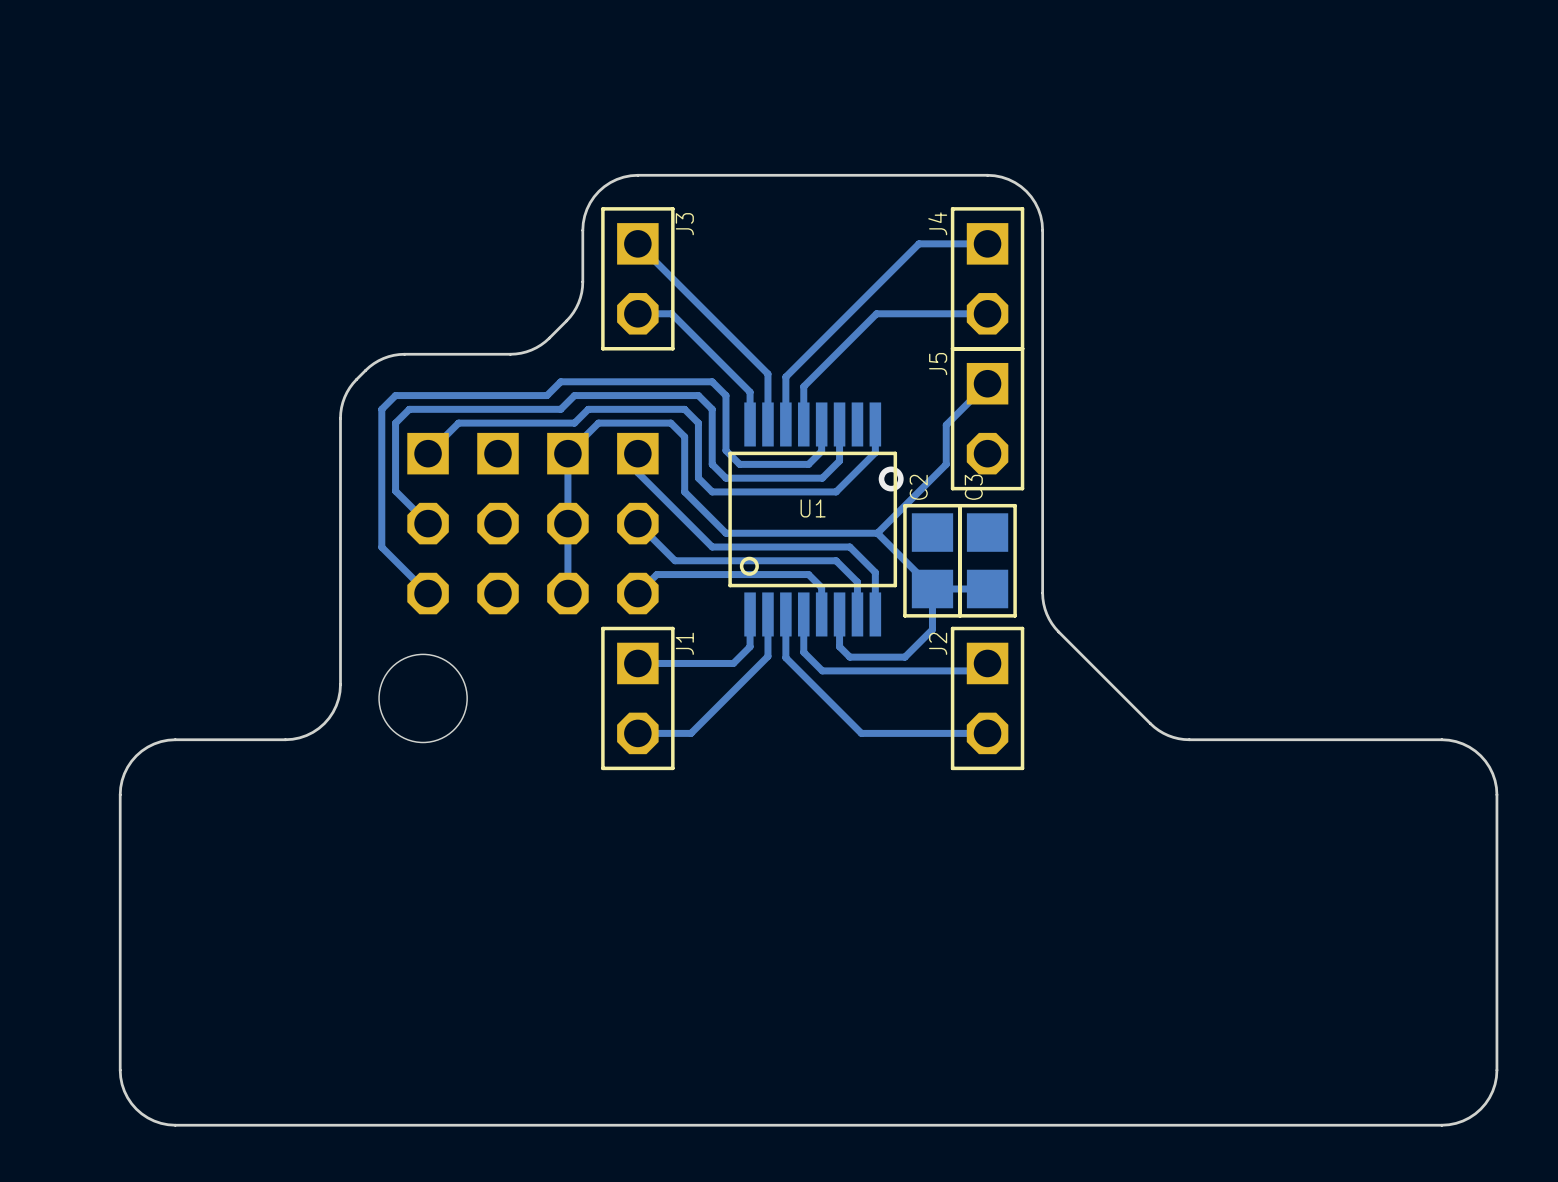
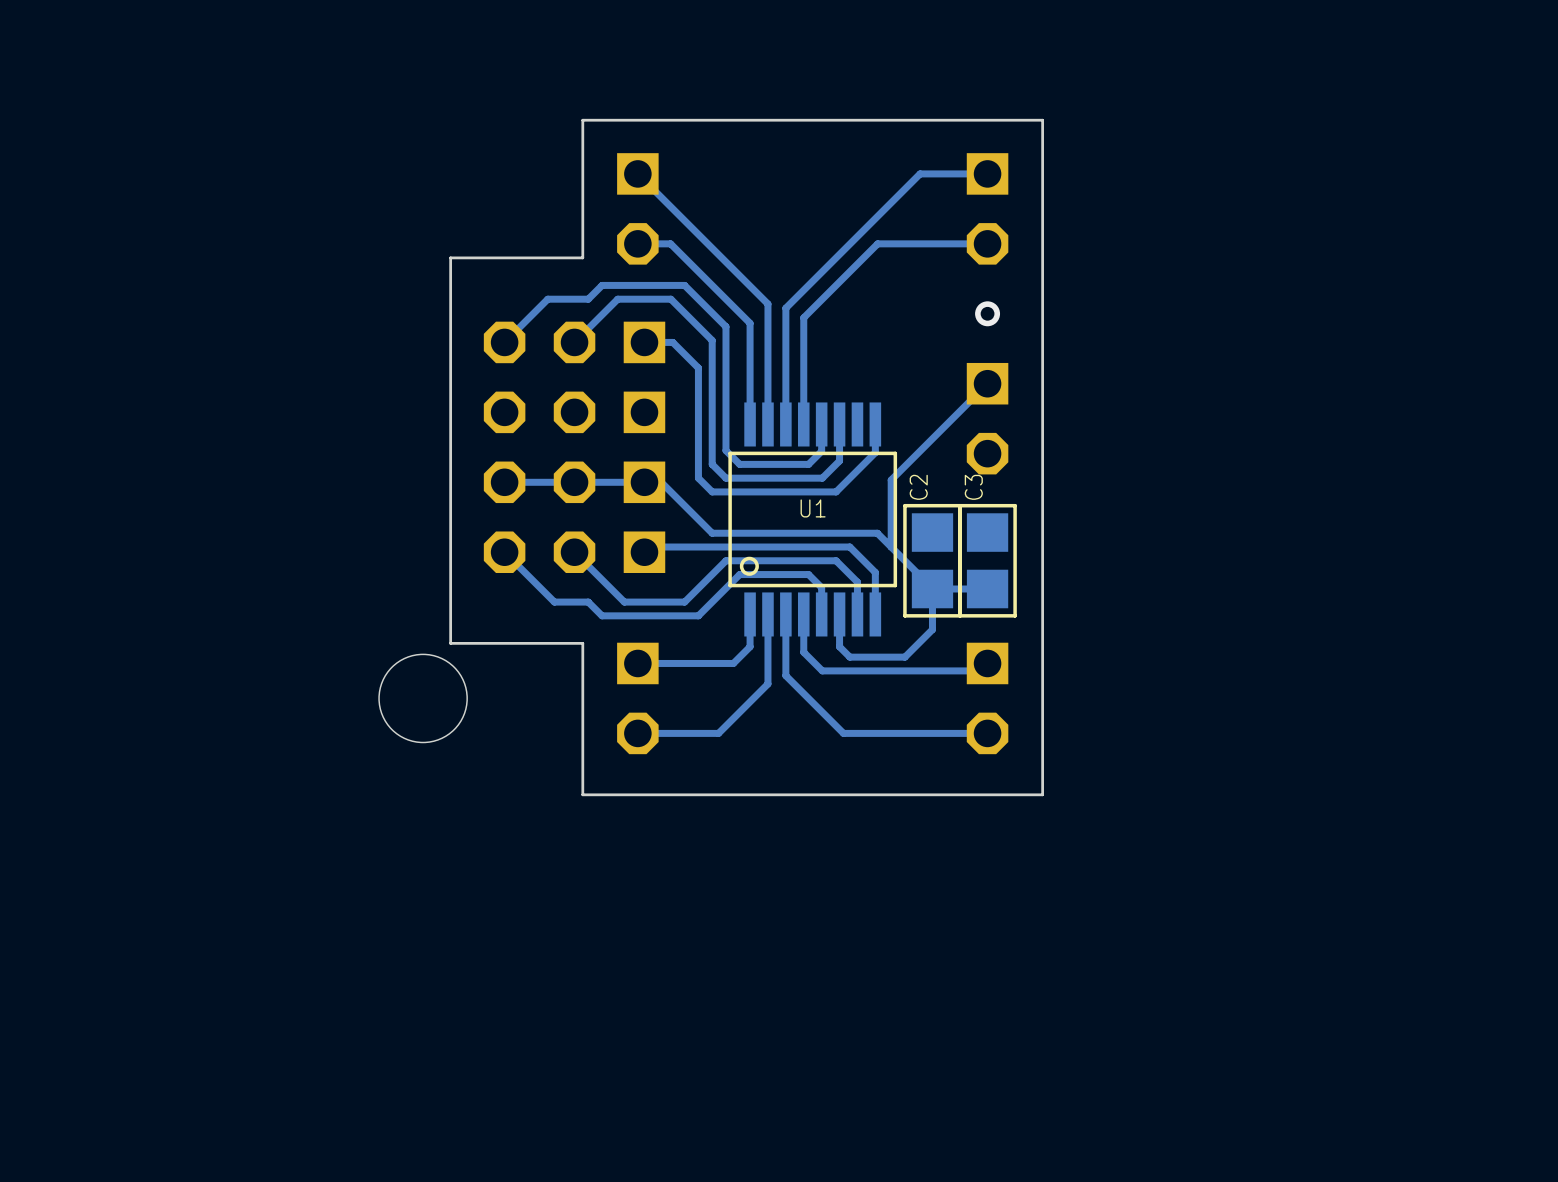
track: none -> (637, 173) (767, 304) (767, 373)
track: none -> (987, 173) (920, 173) (785, 308) (785, 376)
board edge: (1042, 230) (1038, 209) (1026, 191) (1008, 179) (987, 175) (630, 175) (610, 182) (594, 196) (586, 209) (582, 230) -> (1042, 230) (1042, 120) (582, 120) (582, 230)
track: (637, 243) (767, 373) -> (637, 243) (670, 243) (750, 323) (750, 392)
track: (918, 243) (785, 376) -> (918, 243) (877, 243) (803, 317) (803, 386)
board edge: (582, 257) (582, 287) (576, 307) (549, 338) (536, 347) (515, 354) (393, 355) (383, 358) (369, 366) (347, 392) (341, 407) (340, 418) (340, 691) (333, 712) (324, 723) (312, 732) (292, 739) (175, 739) (161, 741) (141, 751) (127, 767) (122, 780) (120, 794) (120, 1070) (124, 1091) (131, 1103) (141, 1113) (154, 1121) (175, 1125) (1441, 1125) (1462, 1121) (1475, 1113) (1485, 1103) (1492, 1091) (1496, 1070) (1496, 794) (1492, 773) (1485, 761) (1469, 747) (1449, 740) (1189, 739) (1168, 735) (1150, 723) (1055, 627) (1046, 614) (1042, 593) -> (582, 257) (450, 257) (450, 643) (582, 643) (582, 794) (1042, 794) (1042, 593)
J3 side: bottom (637, 278) -> top (637, 208)
J4 side: bottom (987, 278) -> top (987, 208)
track: (637, 313) (671, 313) (750, 392) -> none
track: (987, 313) (876, 313) (803, 386) -> none
via: none -> (987, 313)
part: none -> (574, 342)
track: (725, 395) (712, 381) (560, 381) (547, 395) (395, 395) (381, 409) (381, 547) (428, 593) -> (725, 395) (725, 326) (684, 285) (602, 285) (588, 299) (547, 299) (504, 342)
track: (712, 409) (698, 395) (574, 395) (560, 409) (409, 409) (395, 423) (395, 491) (428, 523) -> (712, 409) (712, 340) (670, 299) (617, 299) (574, 342)
part: none -> (574, 412)
J5 side: bottom (987, 418) -> top (987, 418)
track: (698, 423) (684, 409) (588, 409) (574, 423) (458, 423) (428, 453) -> (698, 423) (698, 368) (672, 342) (644, 342)
track: (946, 425) (946, 464) (877, 533) -> (946, 425) (891, 480) (891, 547)
track: (637, 453) (637, 472) (712, 547) -> (644, 552) (649, 547) (712, 547)
via: (891, 478) -> none
part: none -> (574, 482)
part: (428, 523) -> none
part: (497, 523) -> none
part: (567, 523) -> none
track: (637, 523) (675, 560) (725, 560) -> (574, 552) (624, 602) (684, 602) (725, 560)
part: (637, 523) -> none
track: (725, 533) (684, 491) (684, 436) (670, 423) (598, 423) (567, 453) (567, 593) -> (725, 533) (712, 533) (661, 482) (504, 482)
part: none -> (574, 552)
track: (739, 574) (656, 574) (637, 593) -> (739, 574) (698, 615) (602, 615) (588, 602) (554, 602) (504, 552)
track: (767, 656) (691, 733) -> (767, 656) (767, 683) (718, 733) (691, 733)
track: (785, 657) (861, 733) -> (785, 657) (785, 675) (843, 733) (861, 733)
J1 side: bottom (637, 698) -> top (637, 698)
J2 side: bottom (987, 698) -> top (987, 698)

